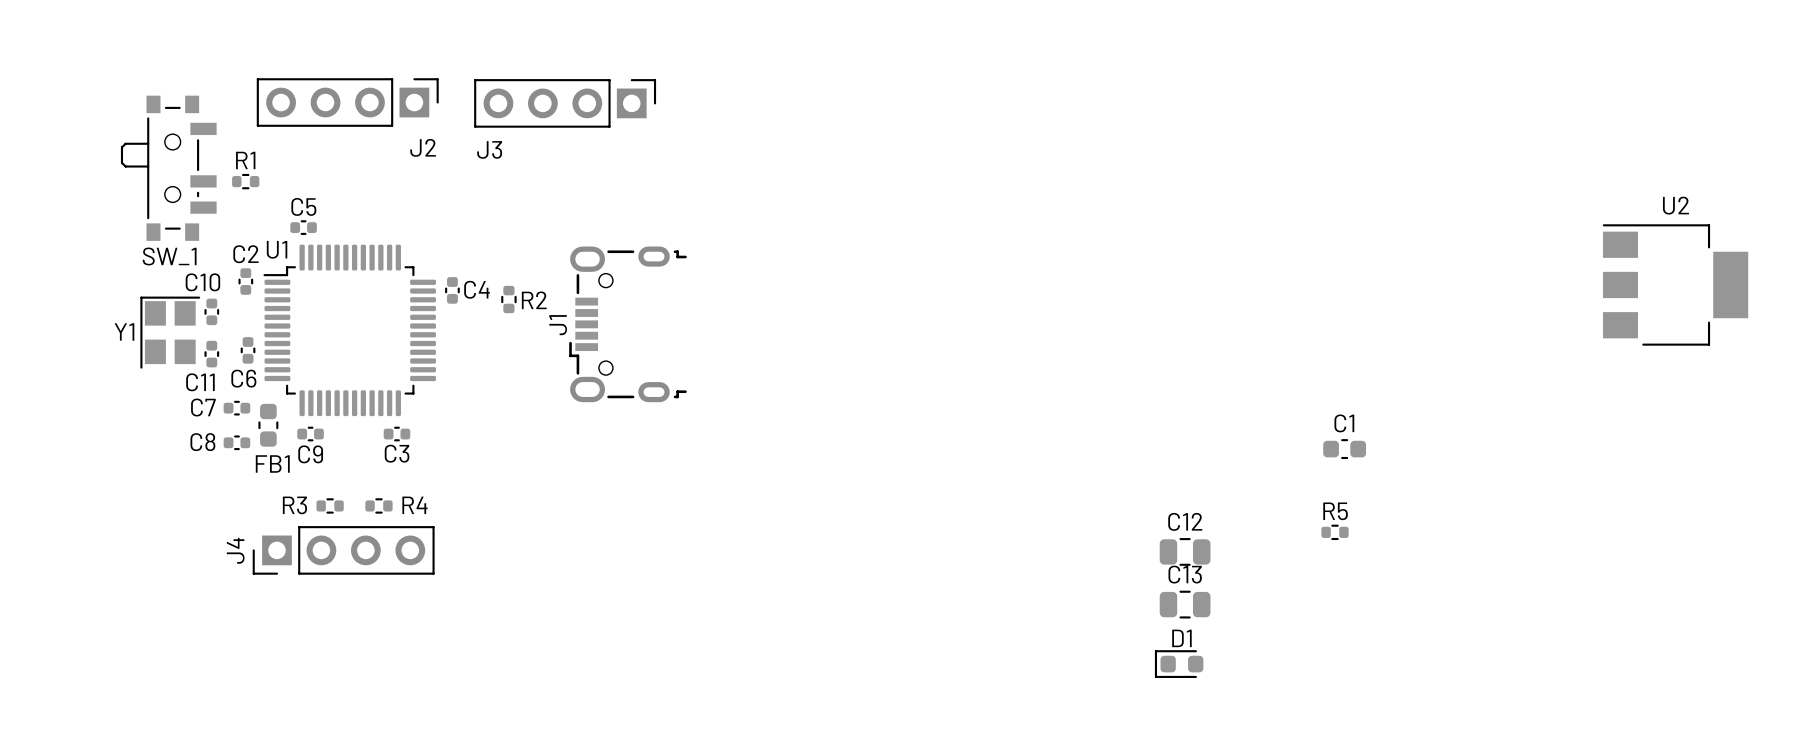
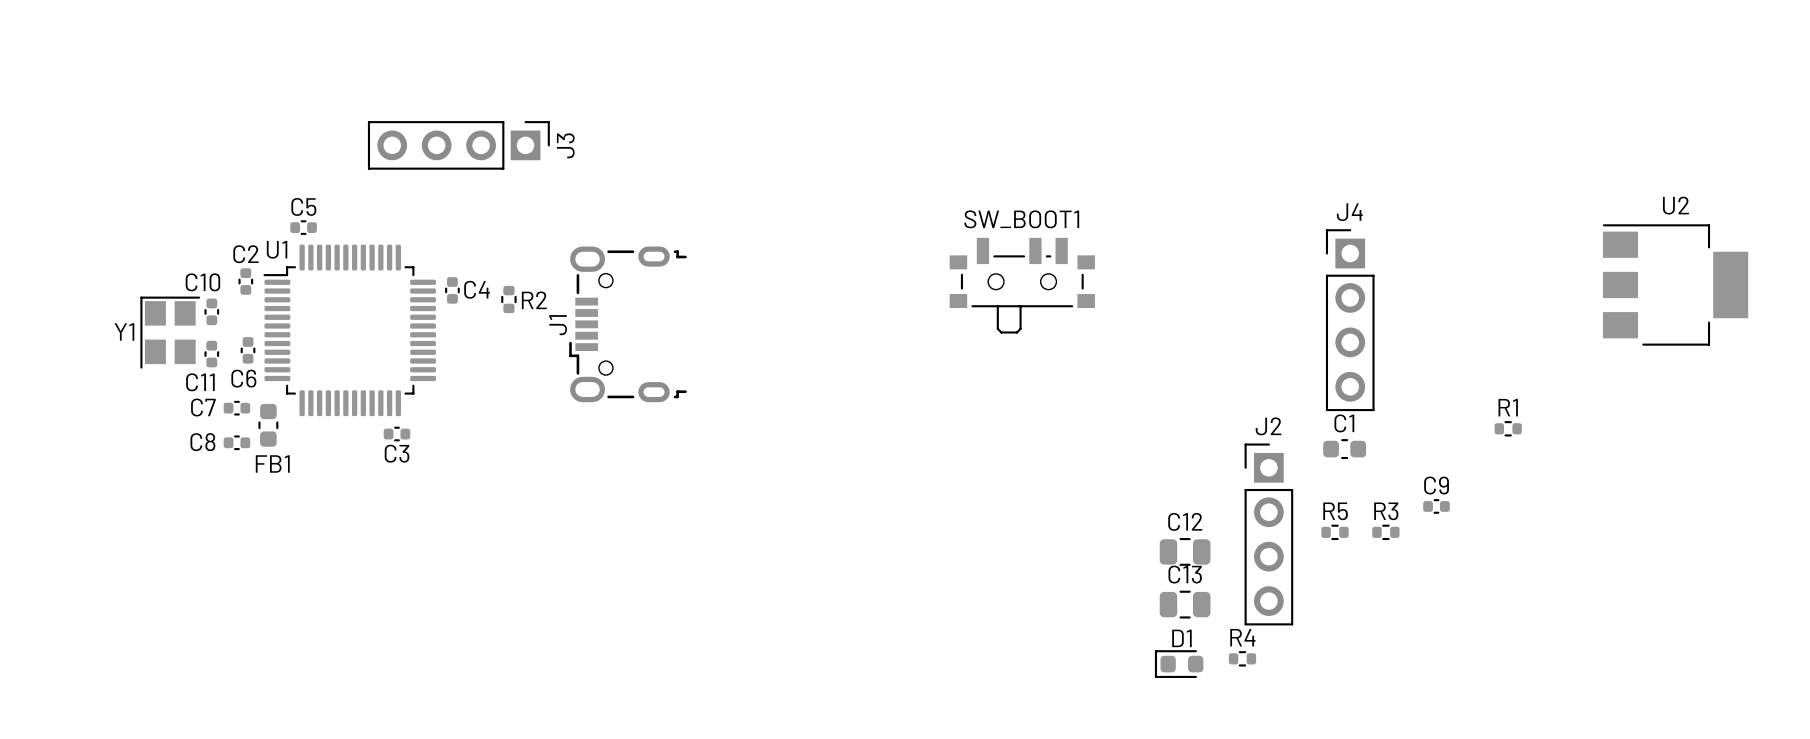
J2 rotation: 0° (347, 102) -> 90° counterclockwise (1268, 534)
J2 position: (347, 102) -> (1268, 534)
J3 position: (565, 103) -> (458, 145)
J2 name position: J2 (423, 147) -> J2 (1268, 426)
J3 name rotation: 0° (489, 149) -> 90° counterclockwise (565, 145)
J3 name position: J3 (489, 149) -> J3 (565, 145)
SW_1: (168, 168) -> none
R1 position: (245, 181) -> (1508, 428)
SW_BOOT1: none -> (1022, 285)
C9 position: (310, 434) -> (1436, 506)
C9 name position: C9 (310, 454) -> C9 (1436, 485)
R3 name position: R3 (294, 505) -> R3 (1386, 511)
R3 position: (330, 505) -> (1385, 532)
R4 position: (378, 505) -> (1242, 658)
R4 name position: R4 (414, 505) -> R4 (1242, 637)
J4 rotation: 0° (343, 550) -> 90° clockwise (1350, 320)
J4 position: (343, 550) -> (1350, 320)

